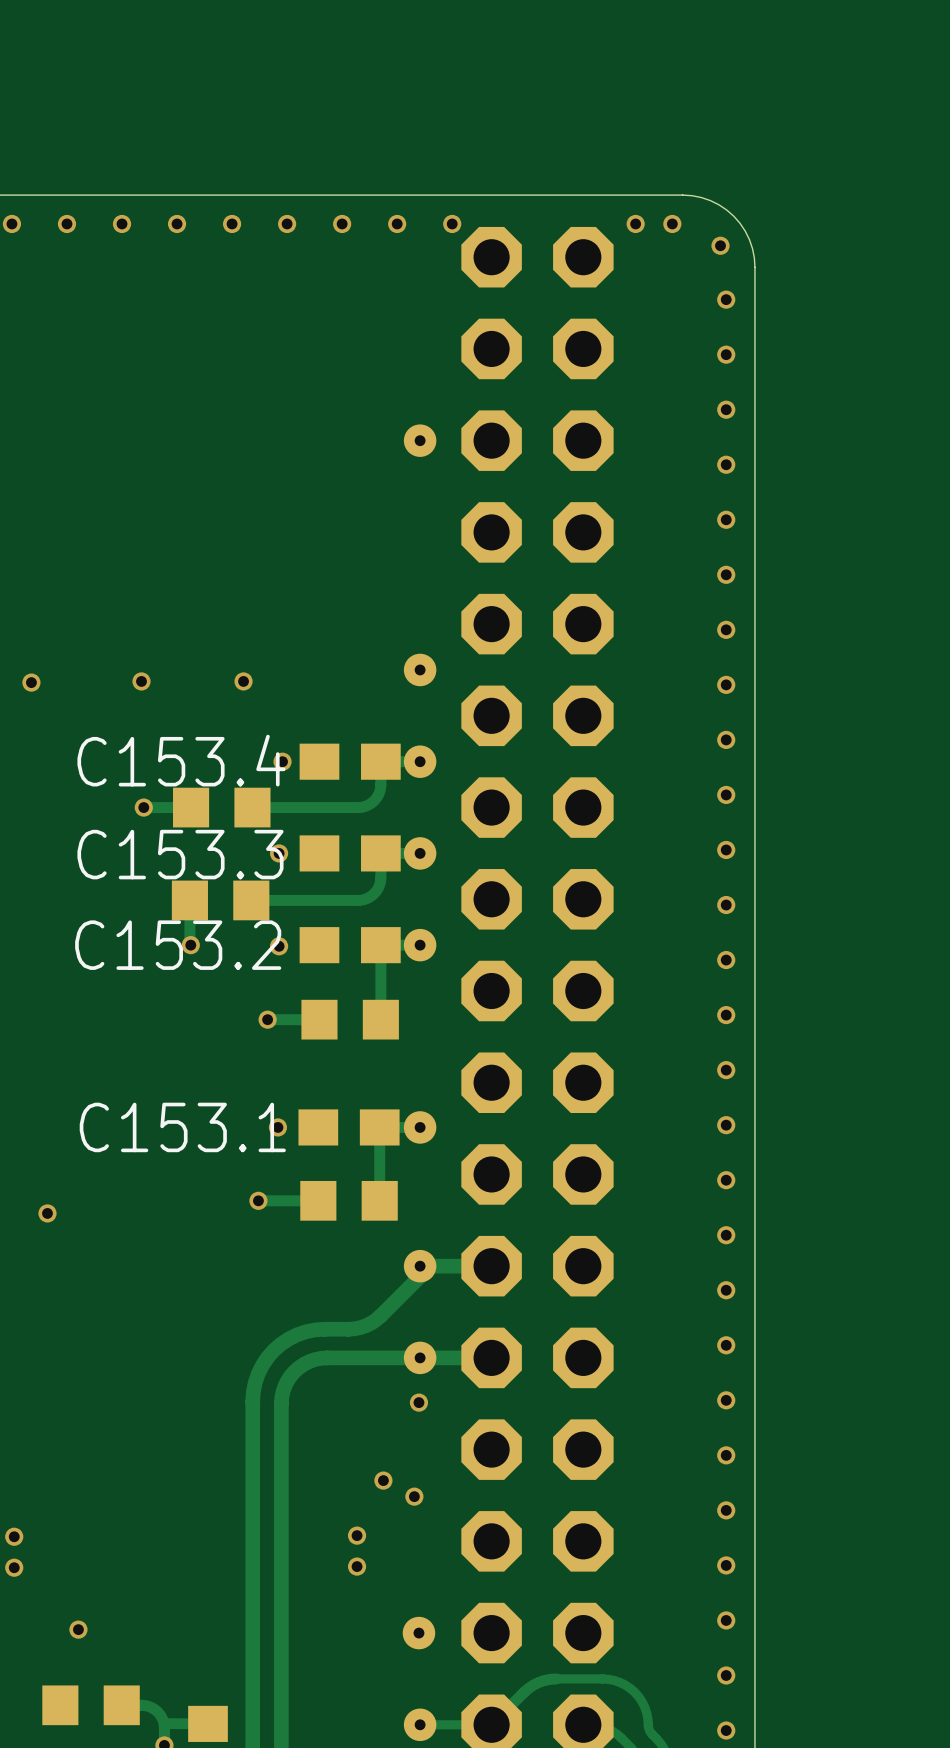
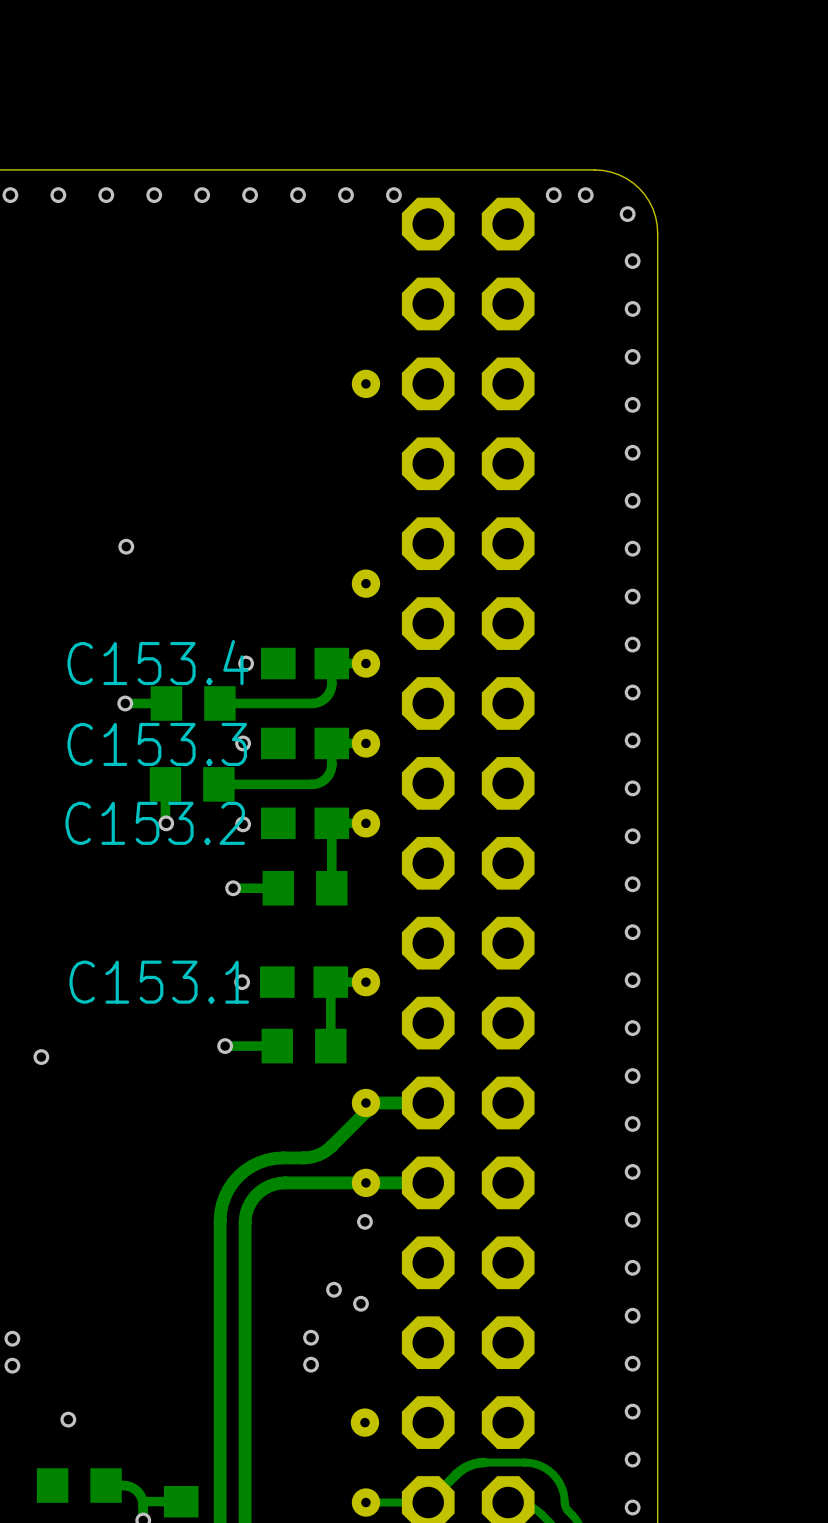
via position: (141, 681) -> (126, 546)
via: (243, 681) -> none
via: (31, 682) -> none

